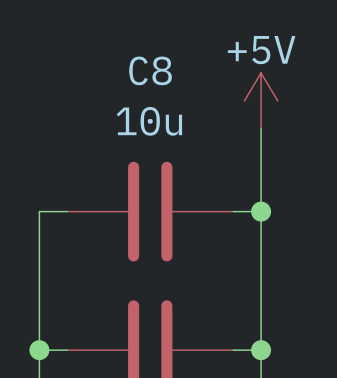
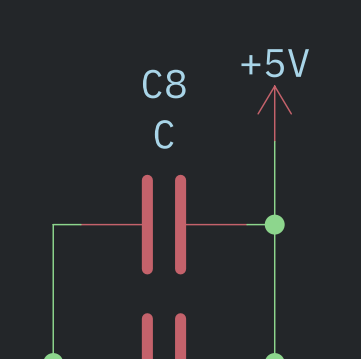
C8 value: 10u (149, 121) -> C (164, 134)

